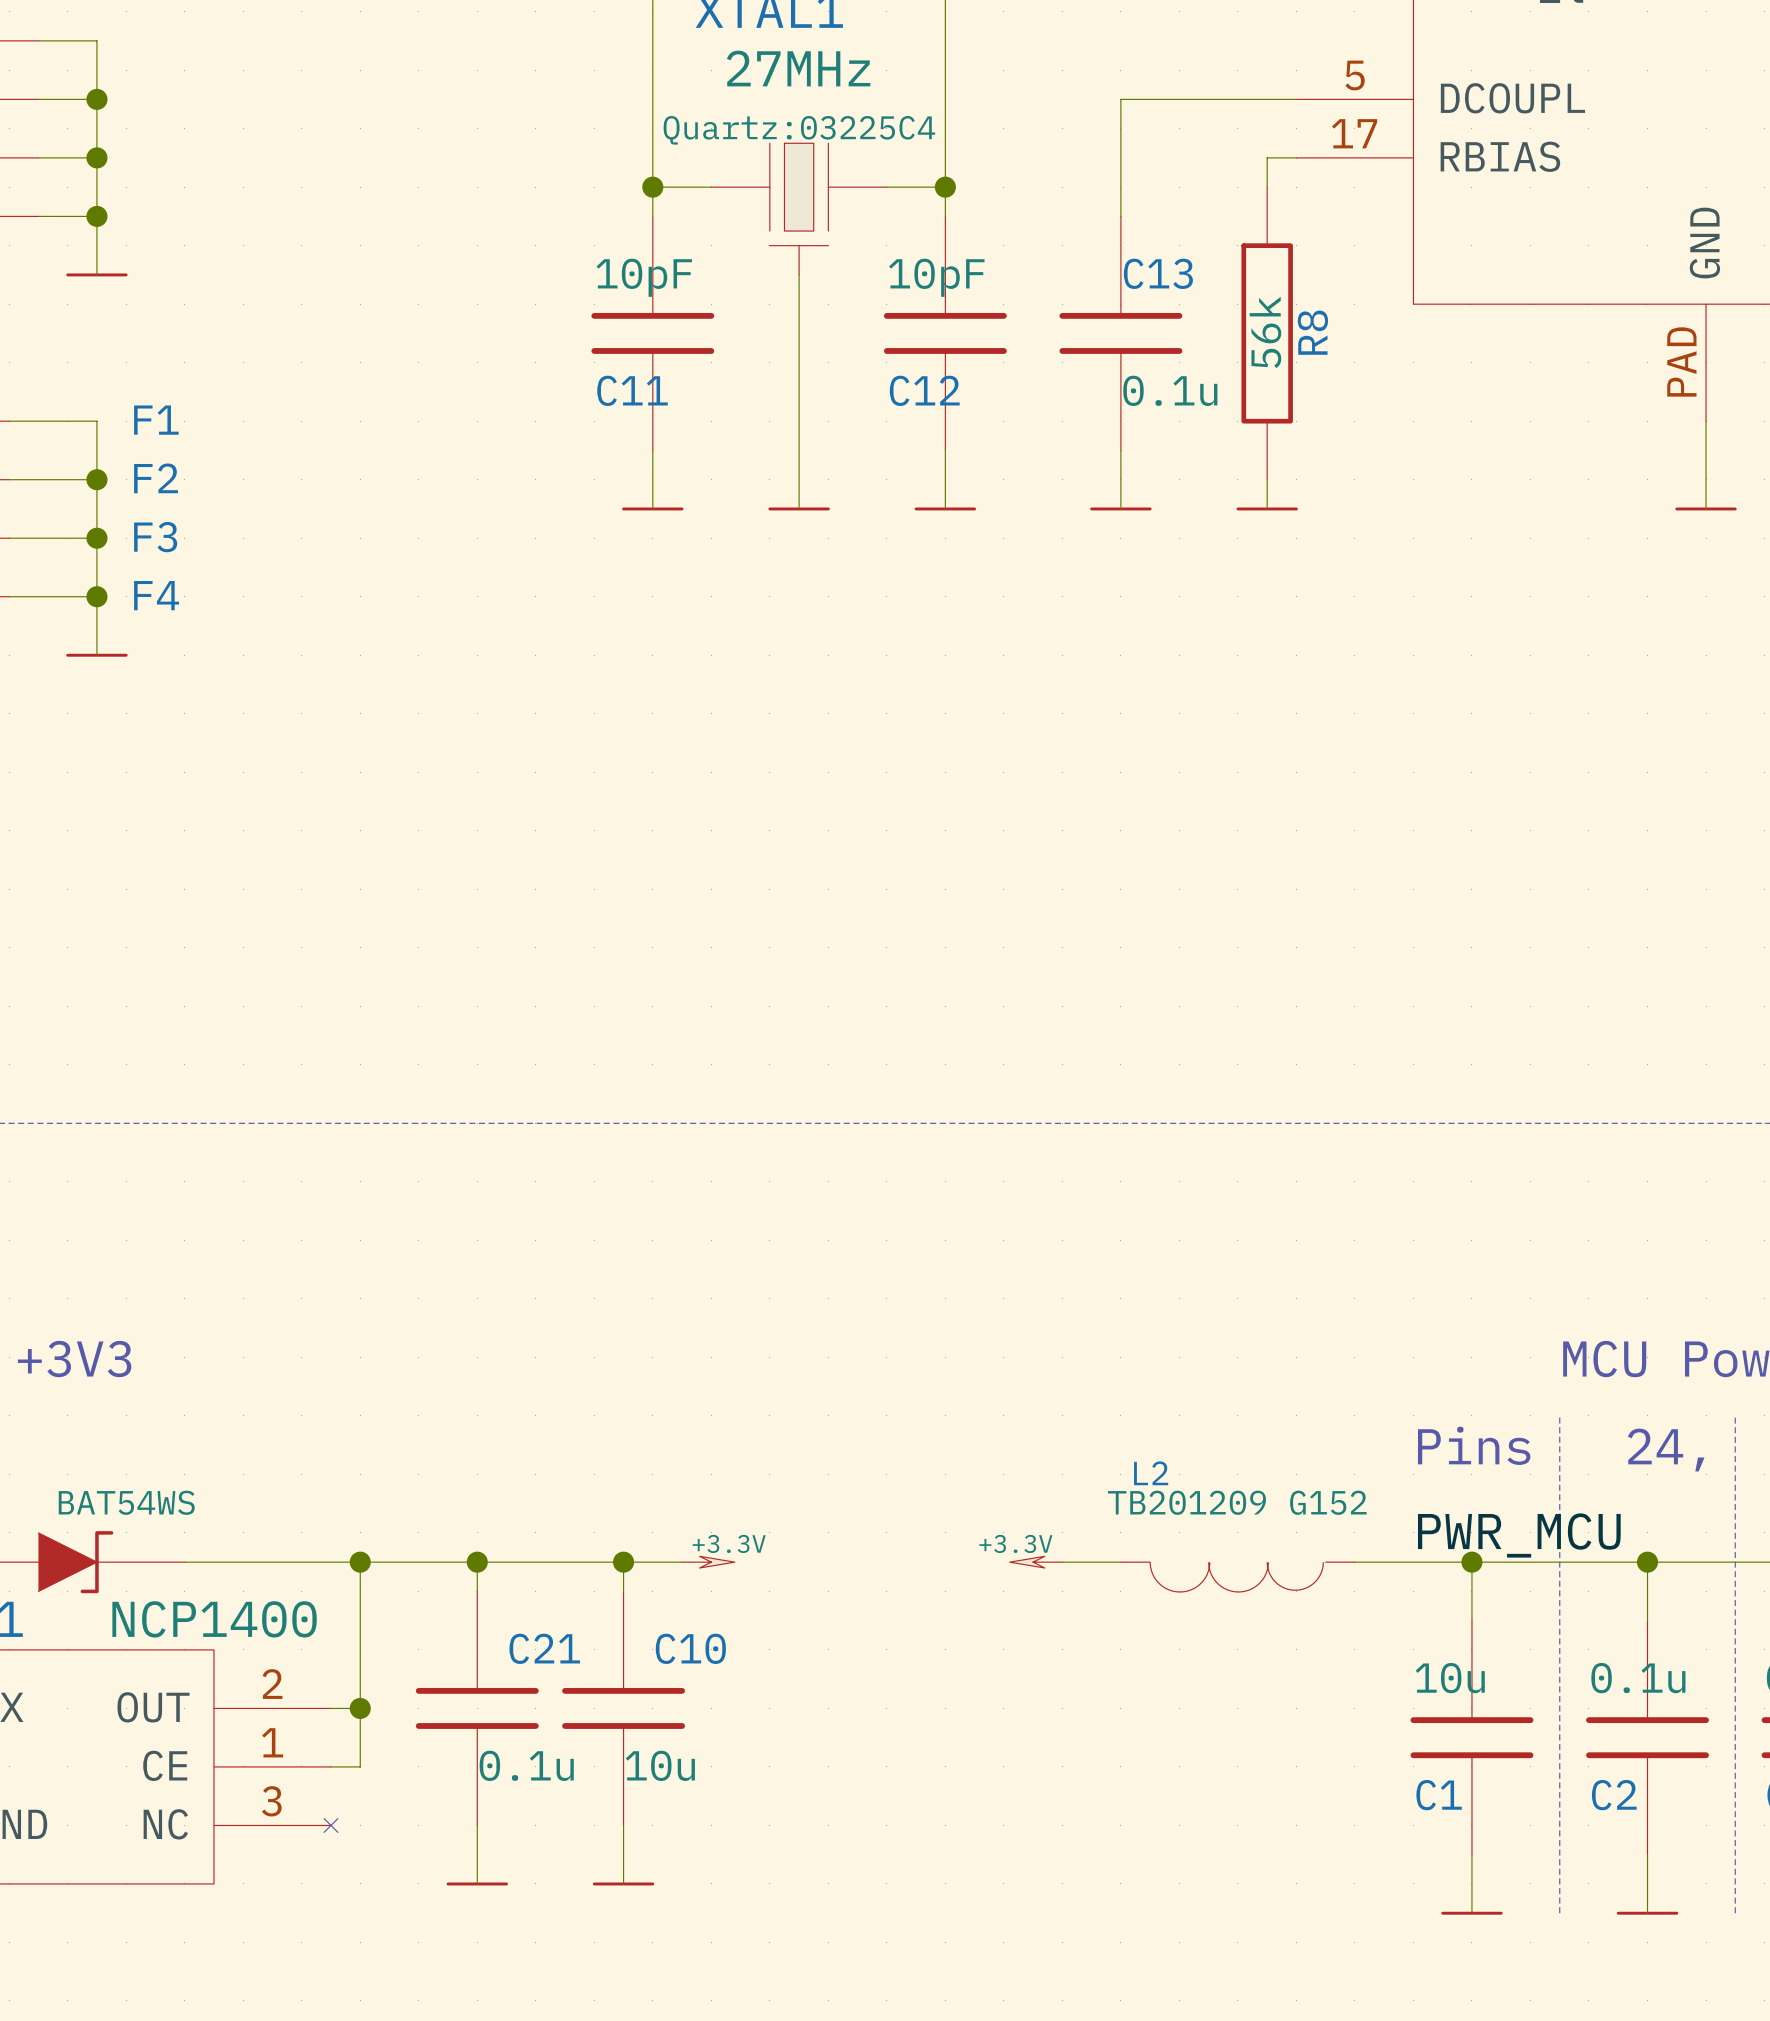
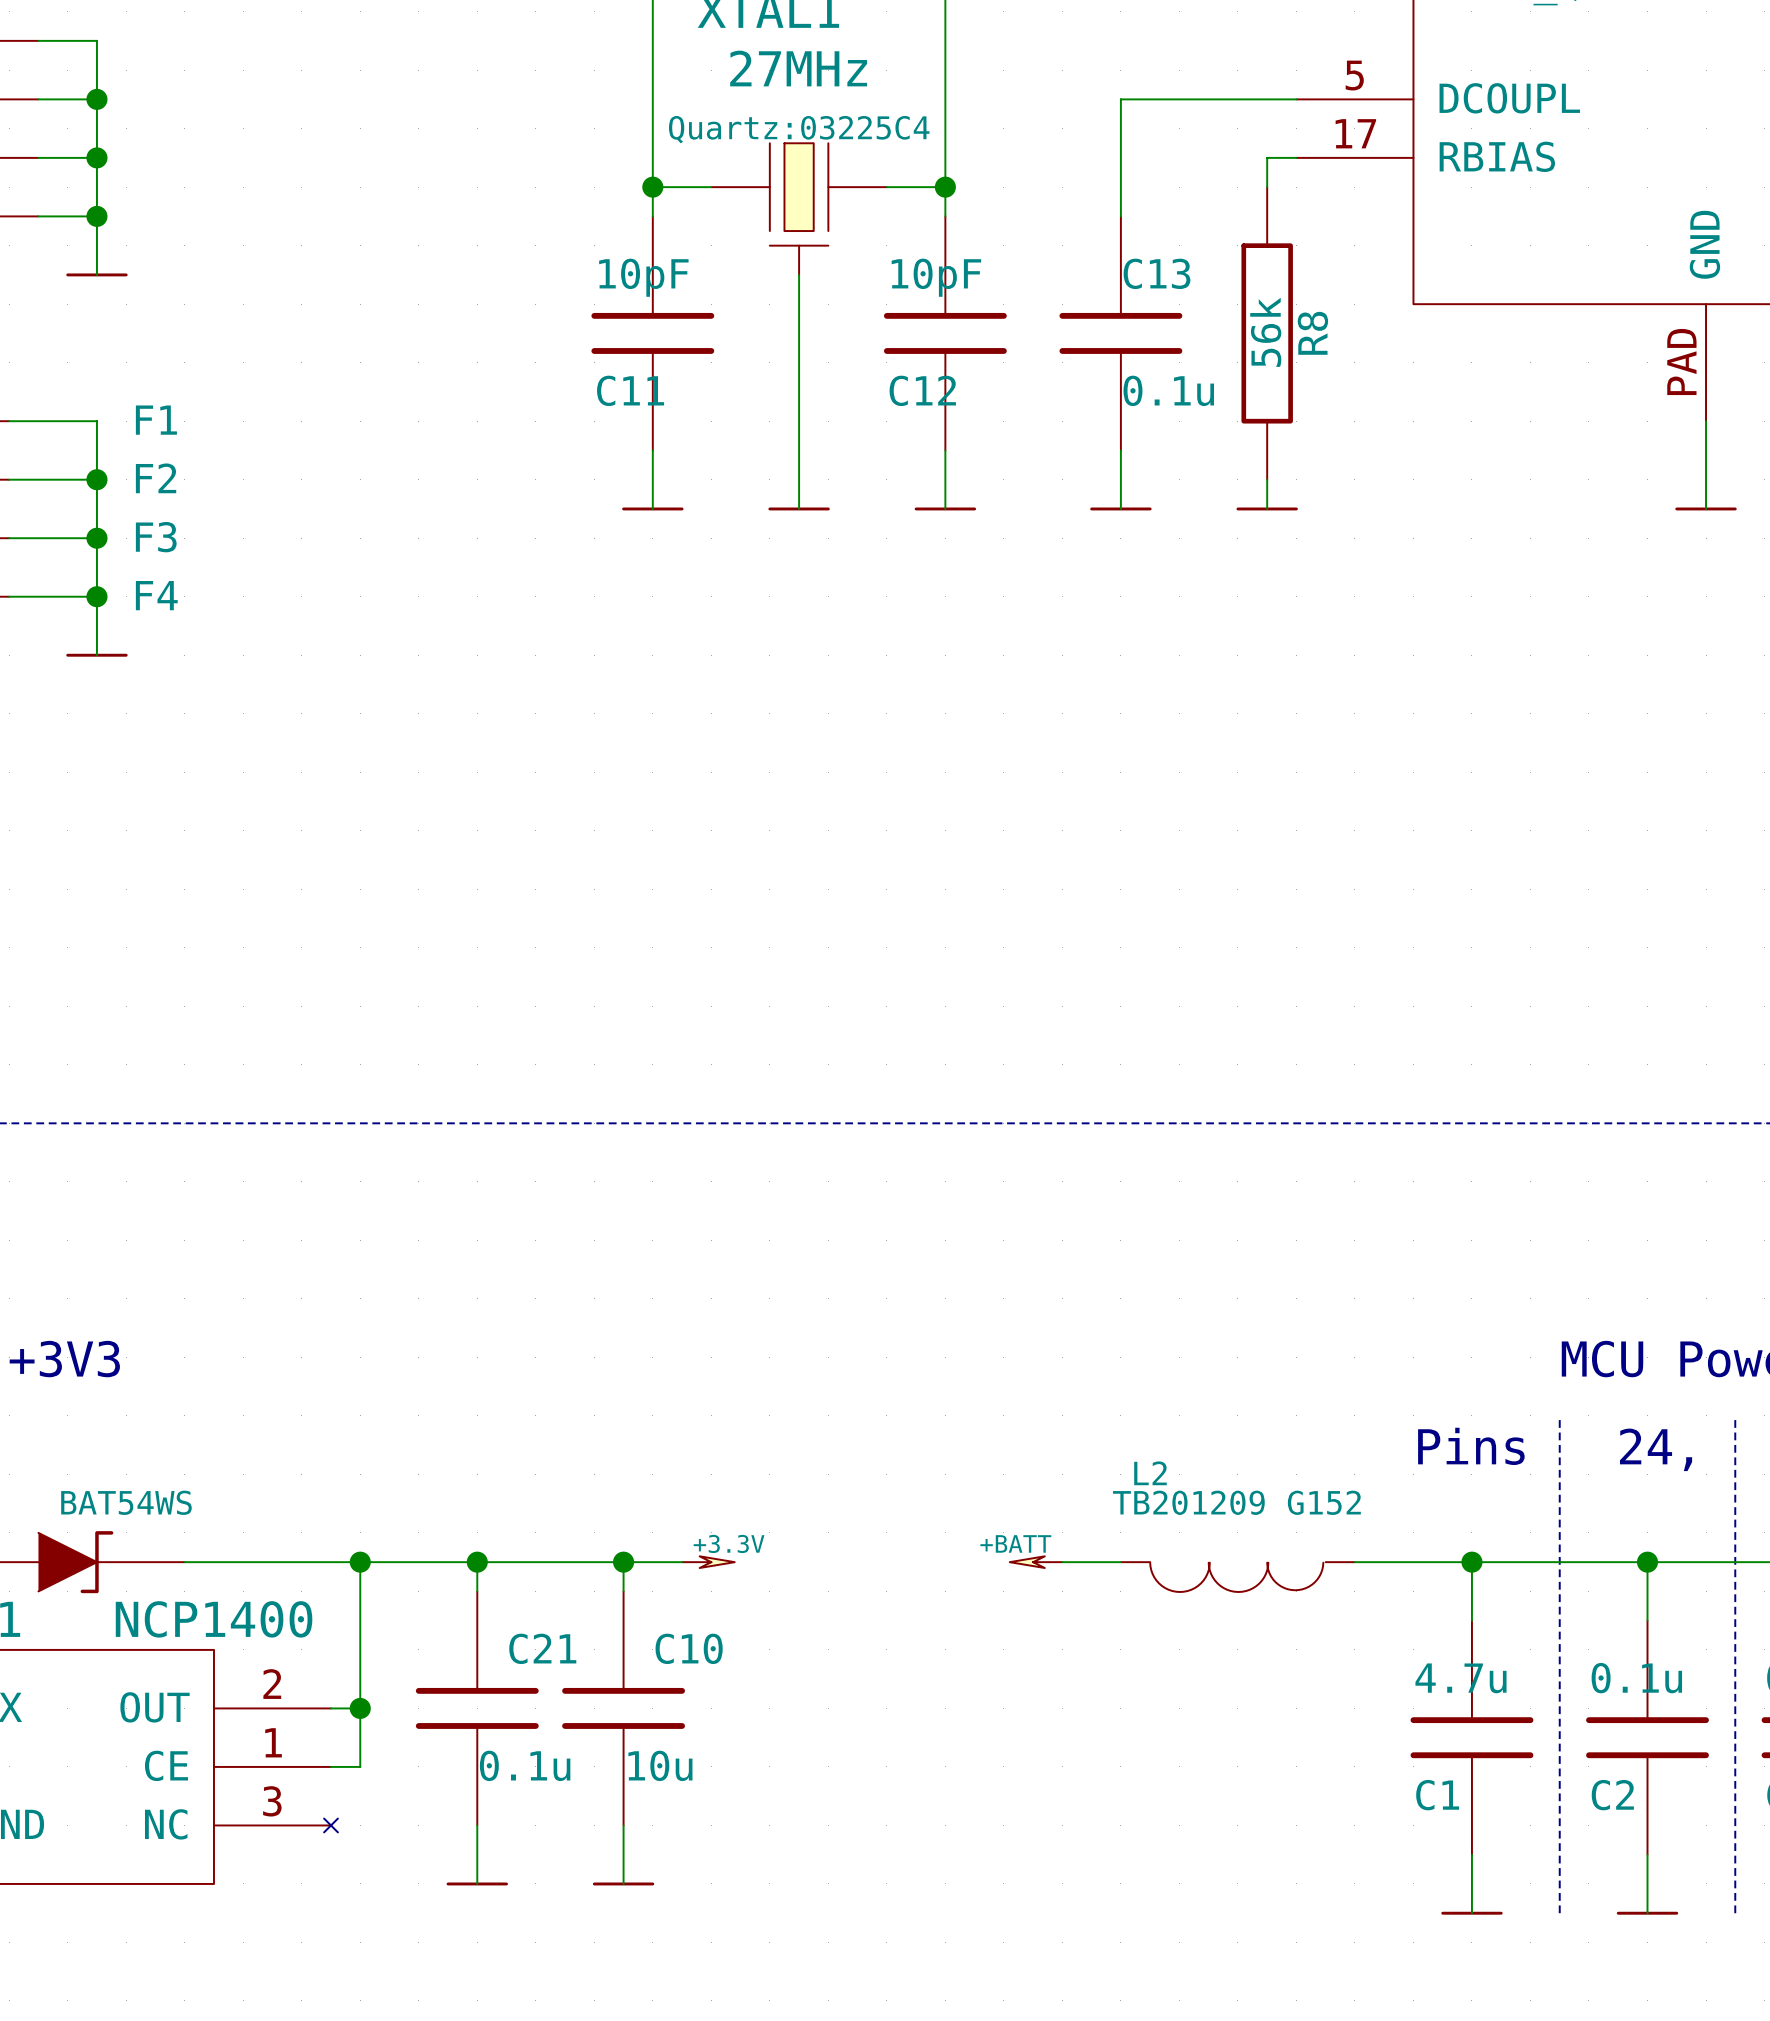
label: PWR_MCU (1519, 1535) -> none
power symbol: +3.3V (1036, 1562) -> +BATT (1036, 1562)
C1 value: 10u (1450, 1678) -> 4.7u (1460, 1678)

